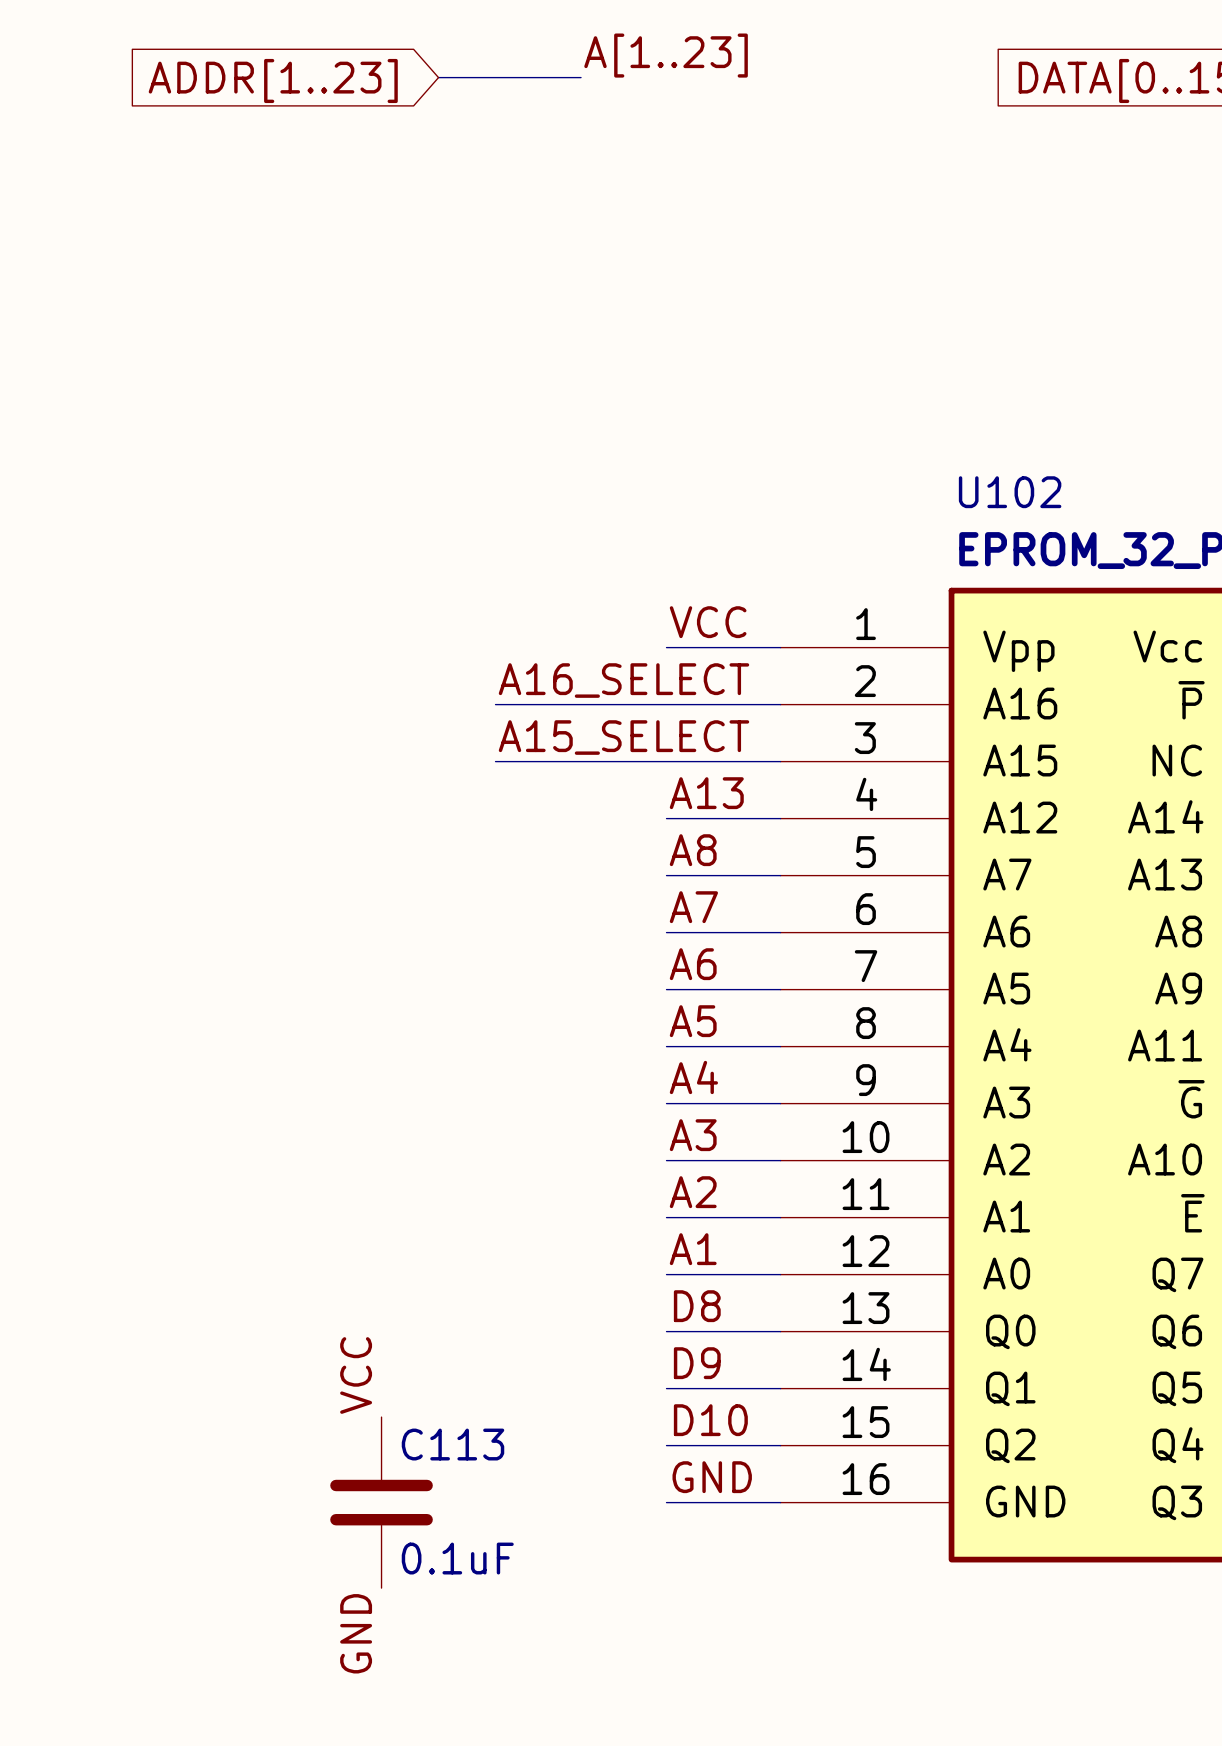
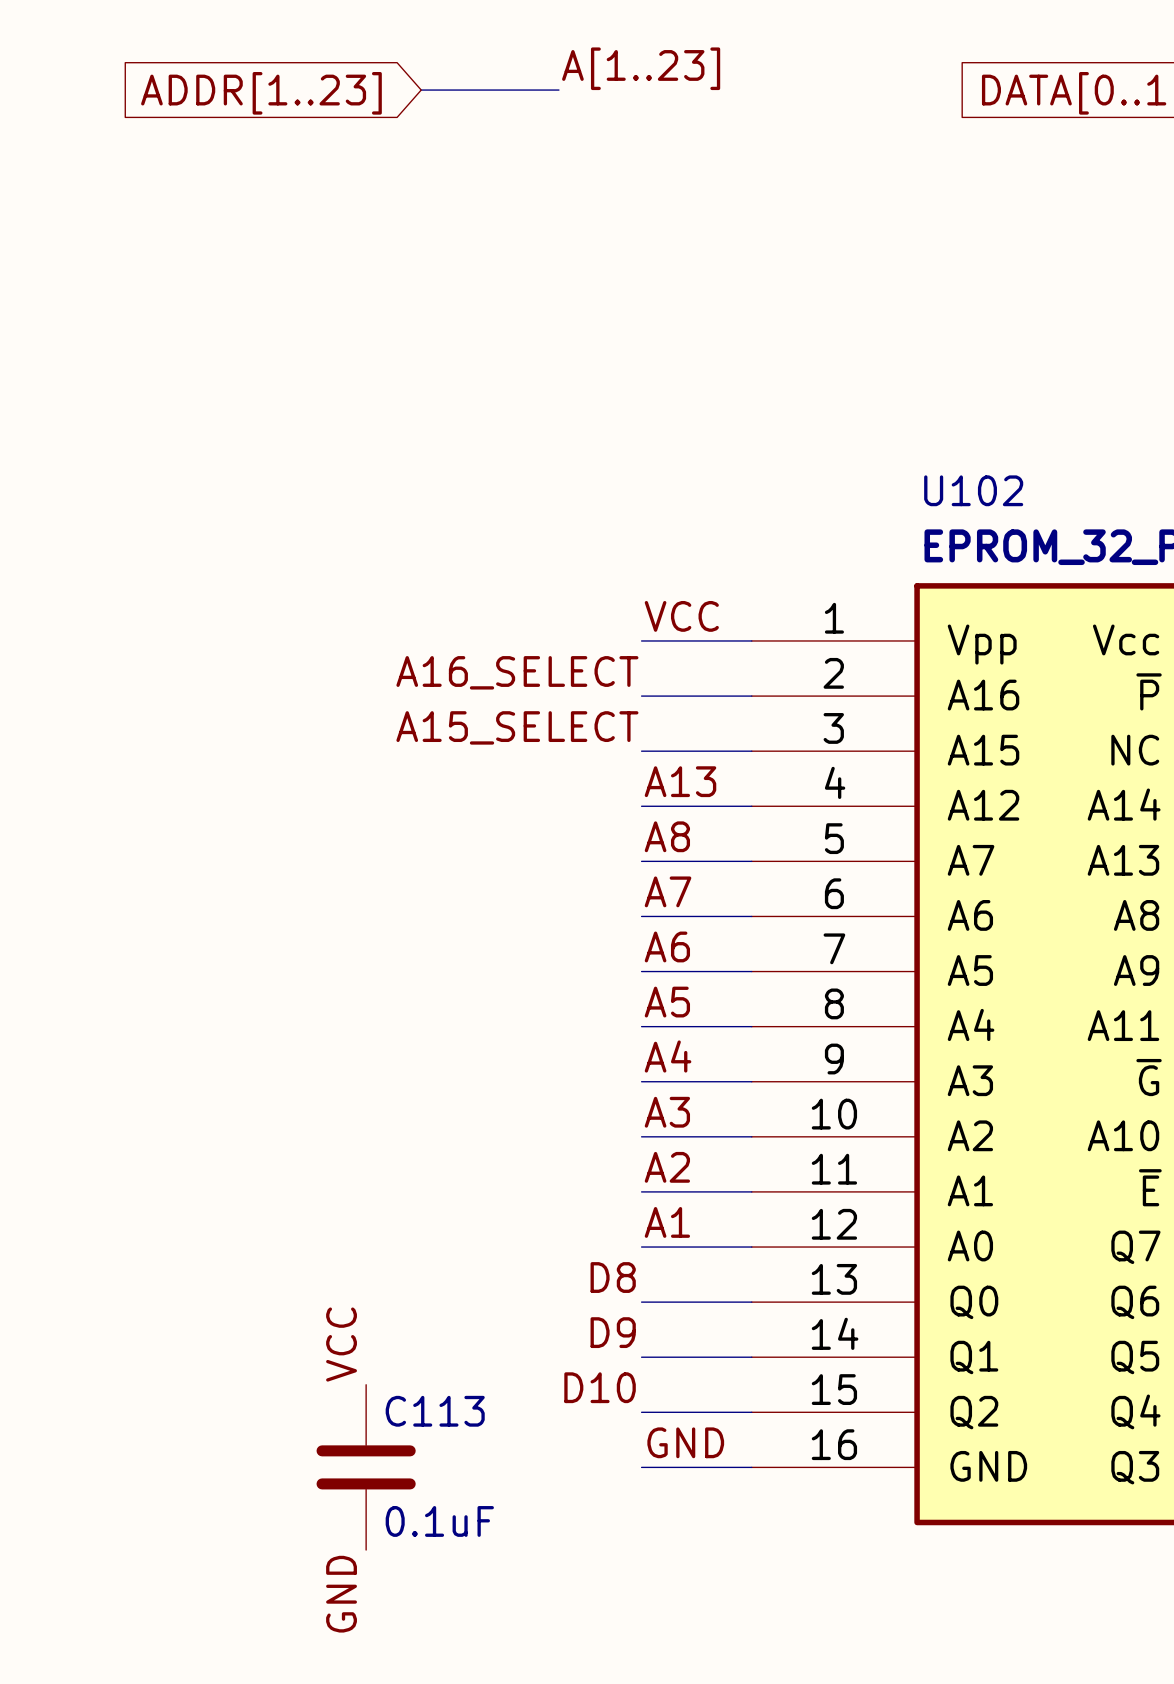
label position: A16_SELECT (623, 680) -> A16_SELECT (517, 672)
wire: (495, 704) (666, 704) -> none
label position: A15_SELECT (623, 737) -> A15_SELECT (517, 727)
wire: (495, 761) (666, 761) -> none
label position: D8 (697, 1306) -> D8 (613, 1277)
label position: D9 (697, 1363) -> D9 (613, 1332)
label position: D10 (710, 1420) -> D10 (600, 1387)

